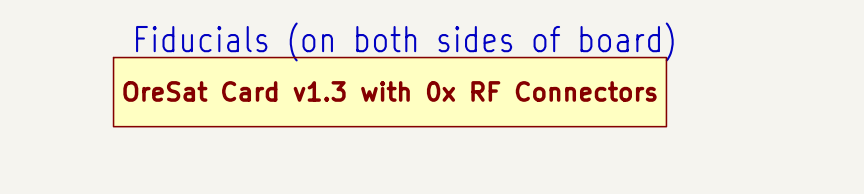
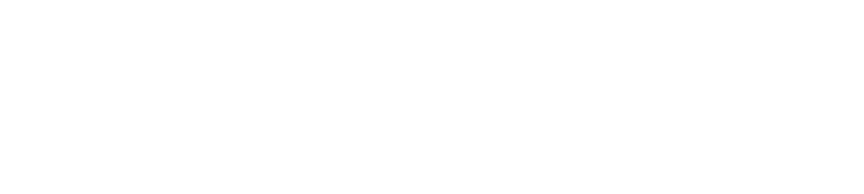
text: Fiducials (on both sides of board) (404, 41) -> none
part: (389, 92) -> none

